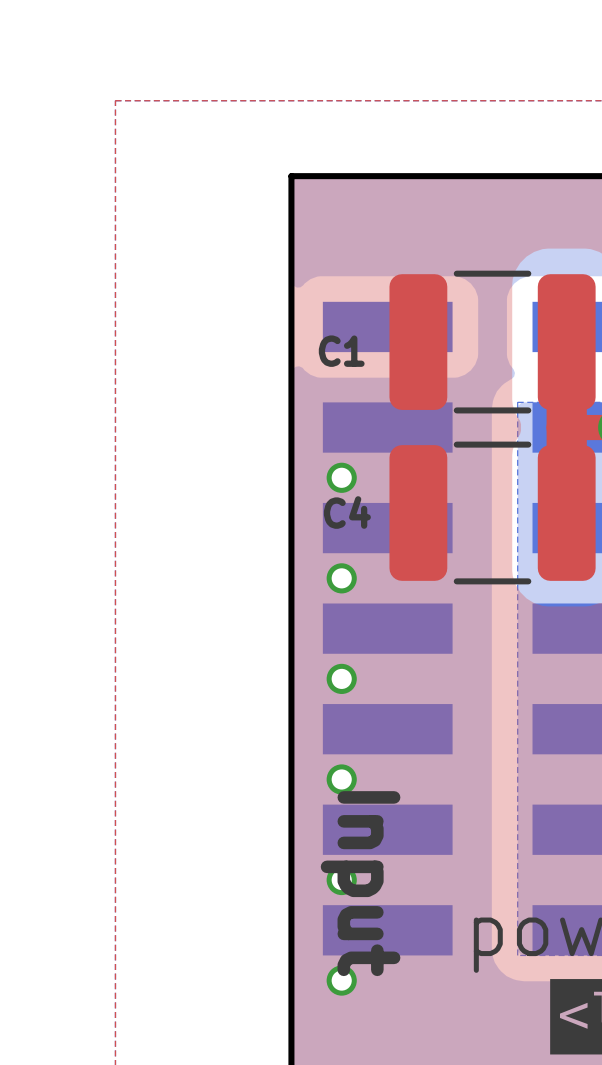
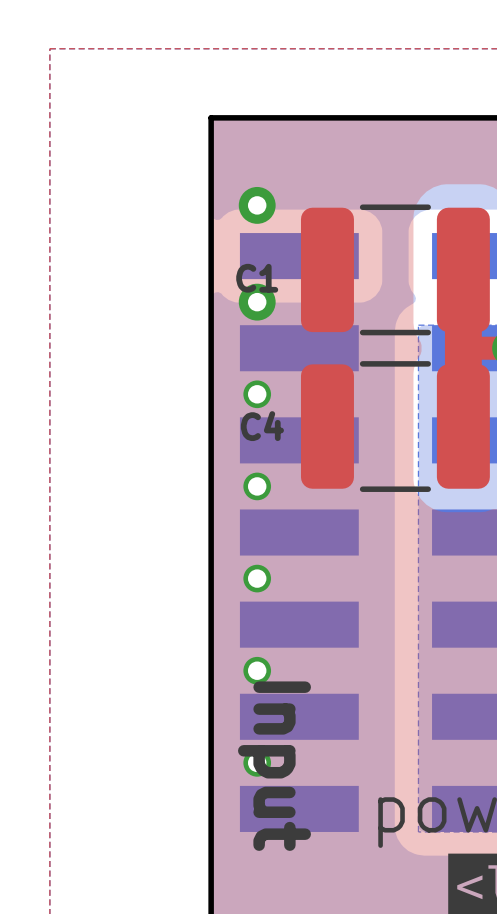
via: none -> (257, 205)
via: none -> (257, 302)
via: (341, 980) -> none

